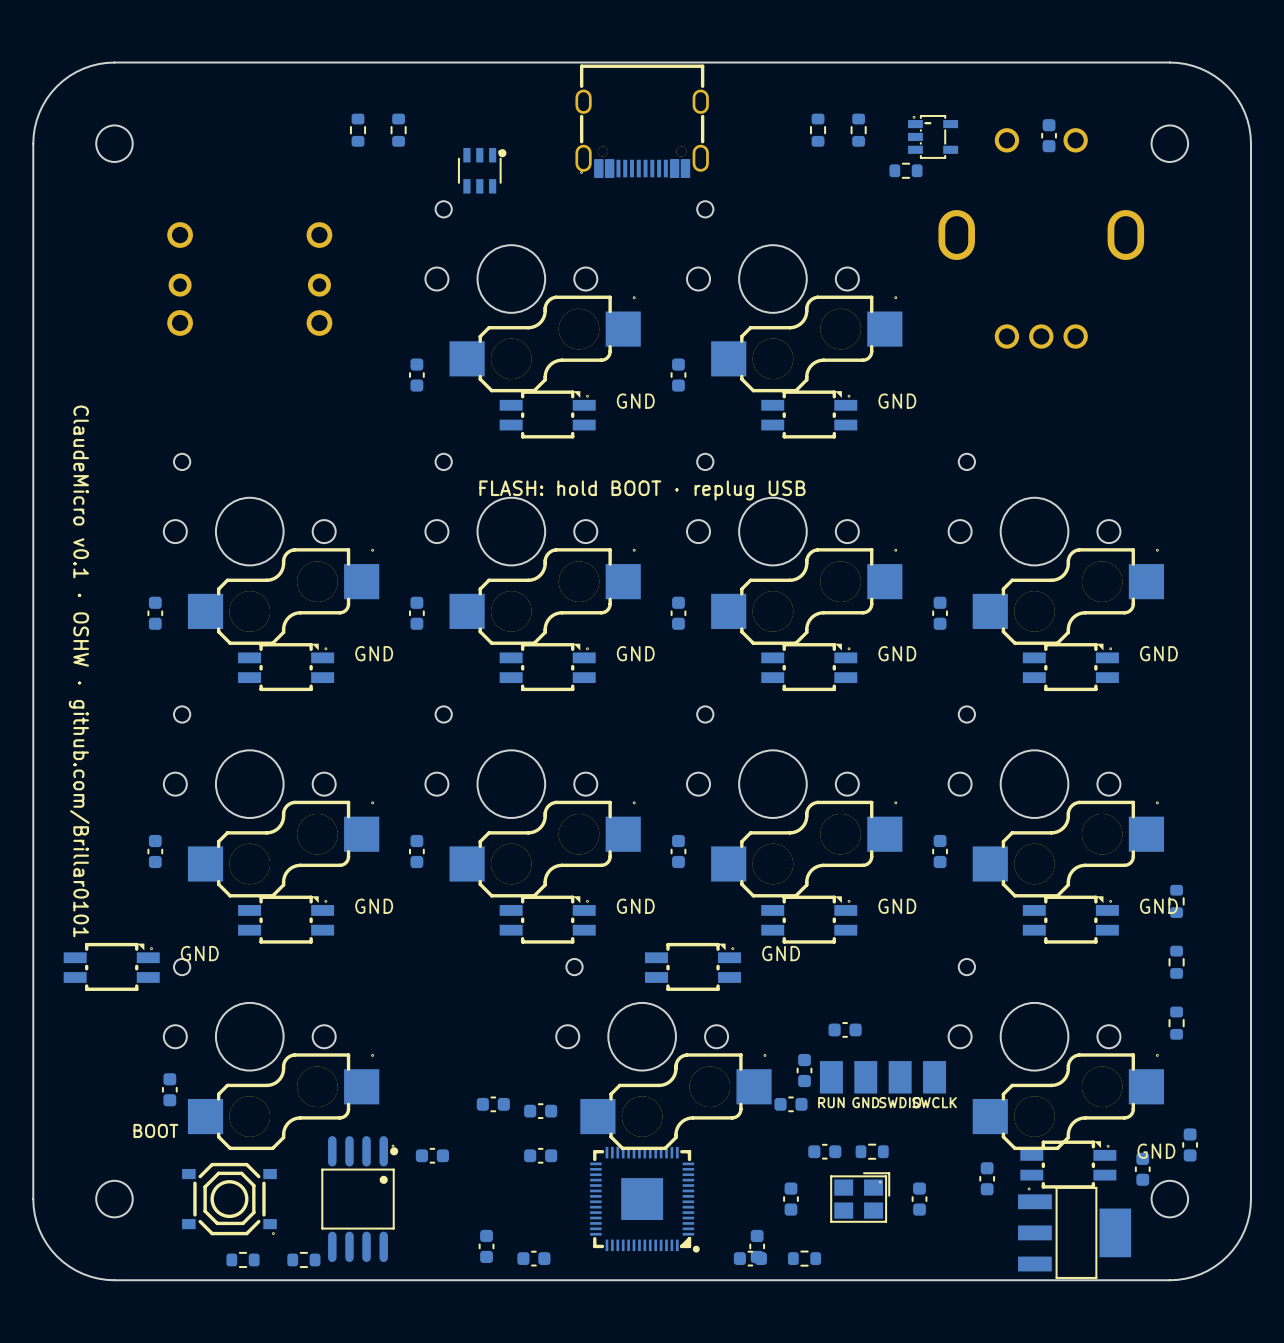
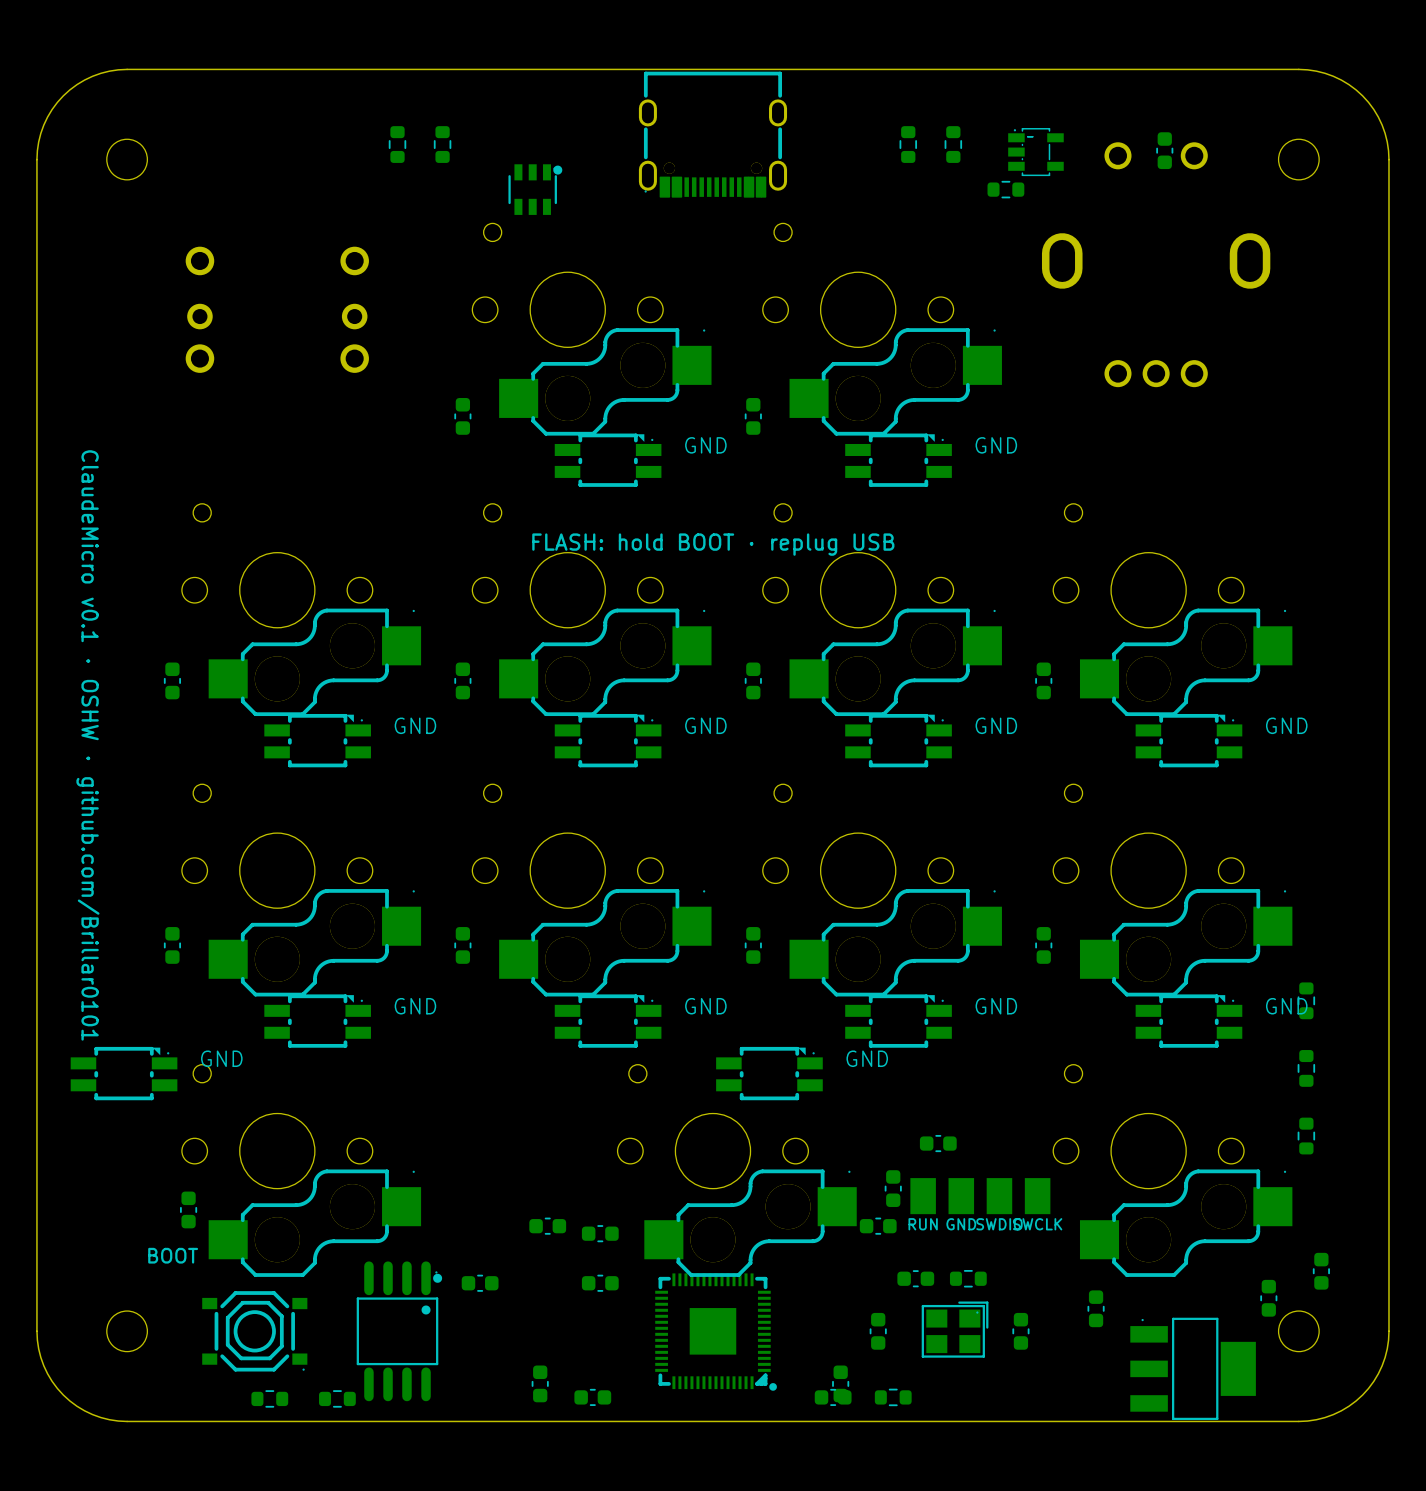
part: (1068, 1164) -> none

